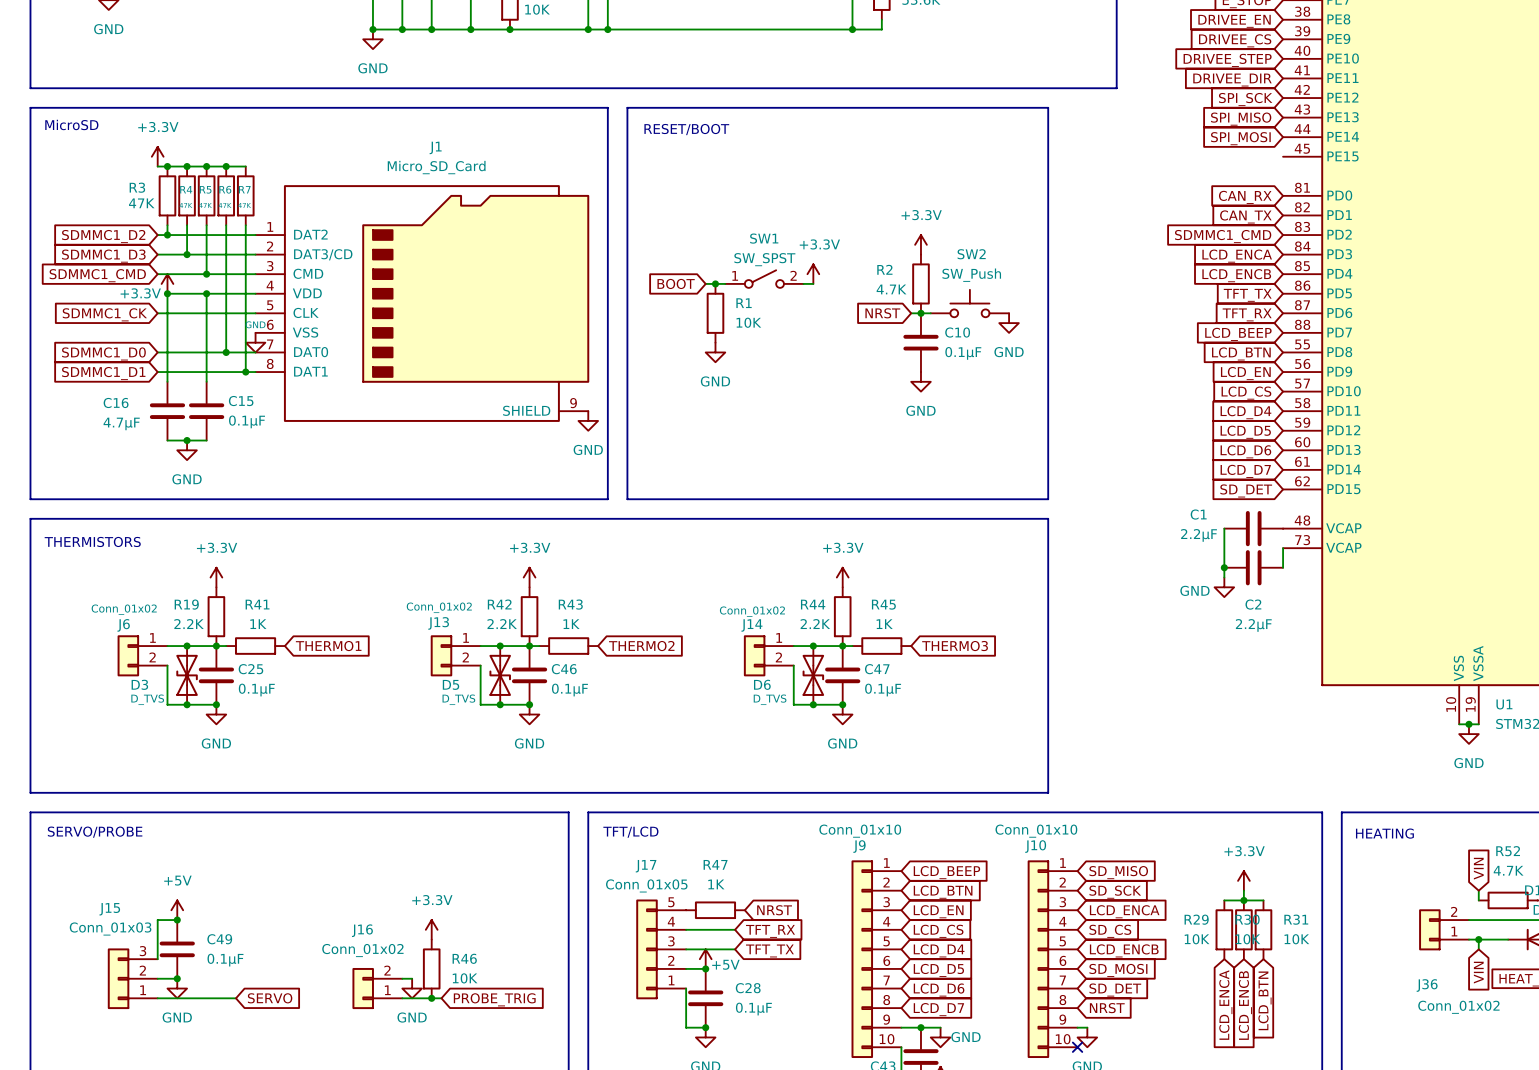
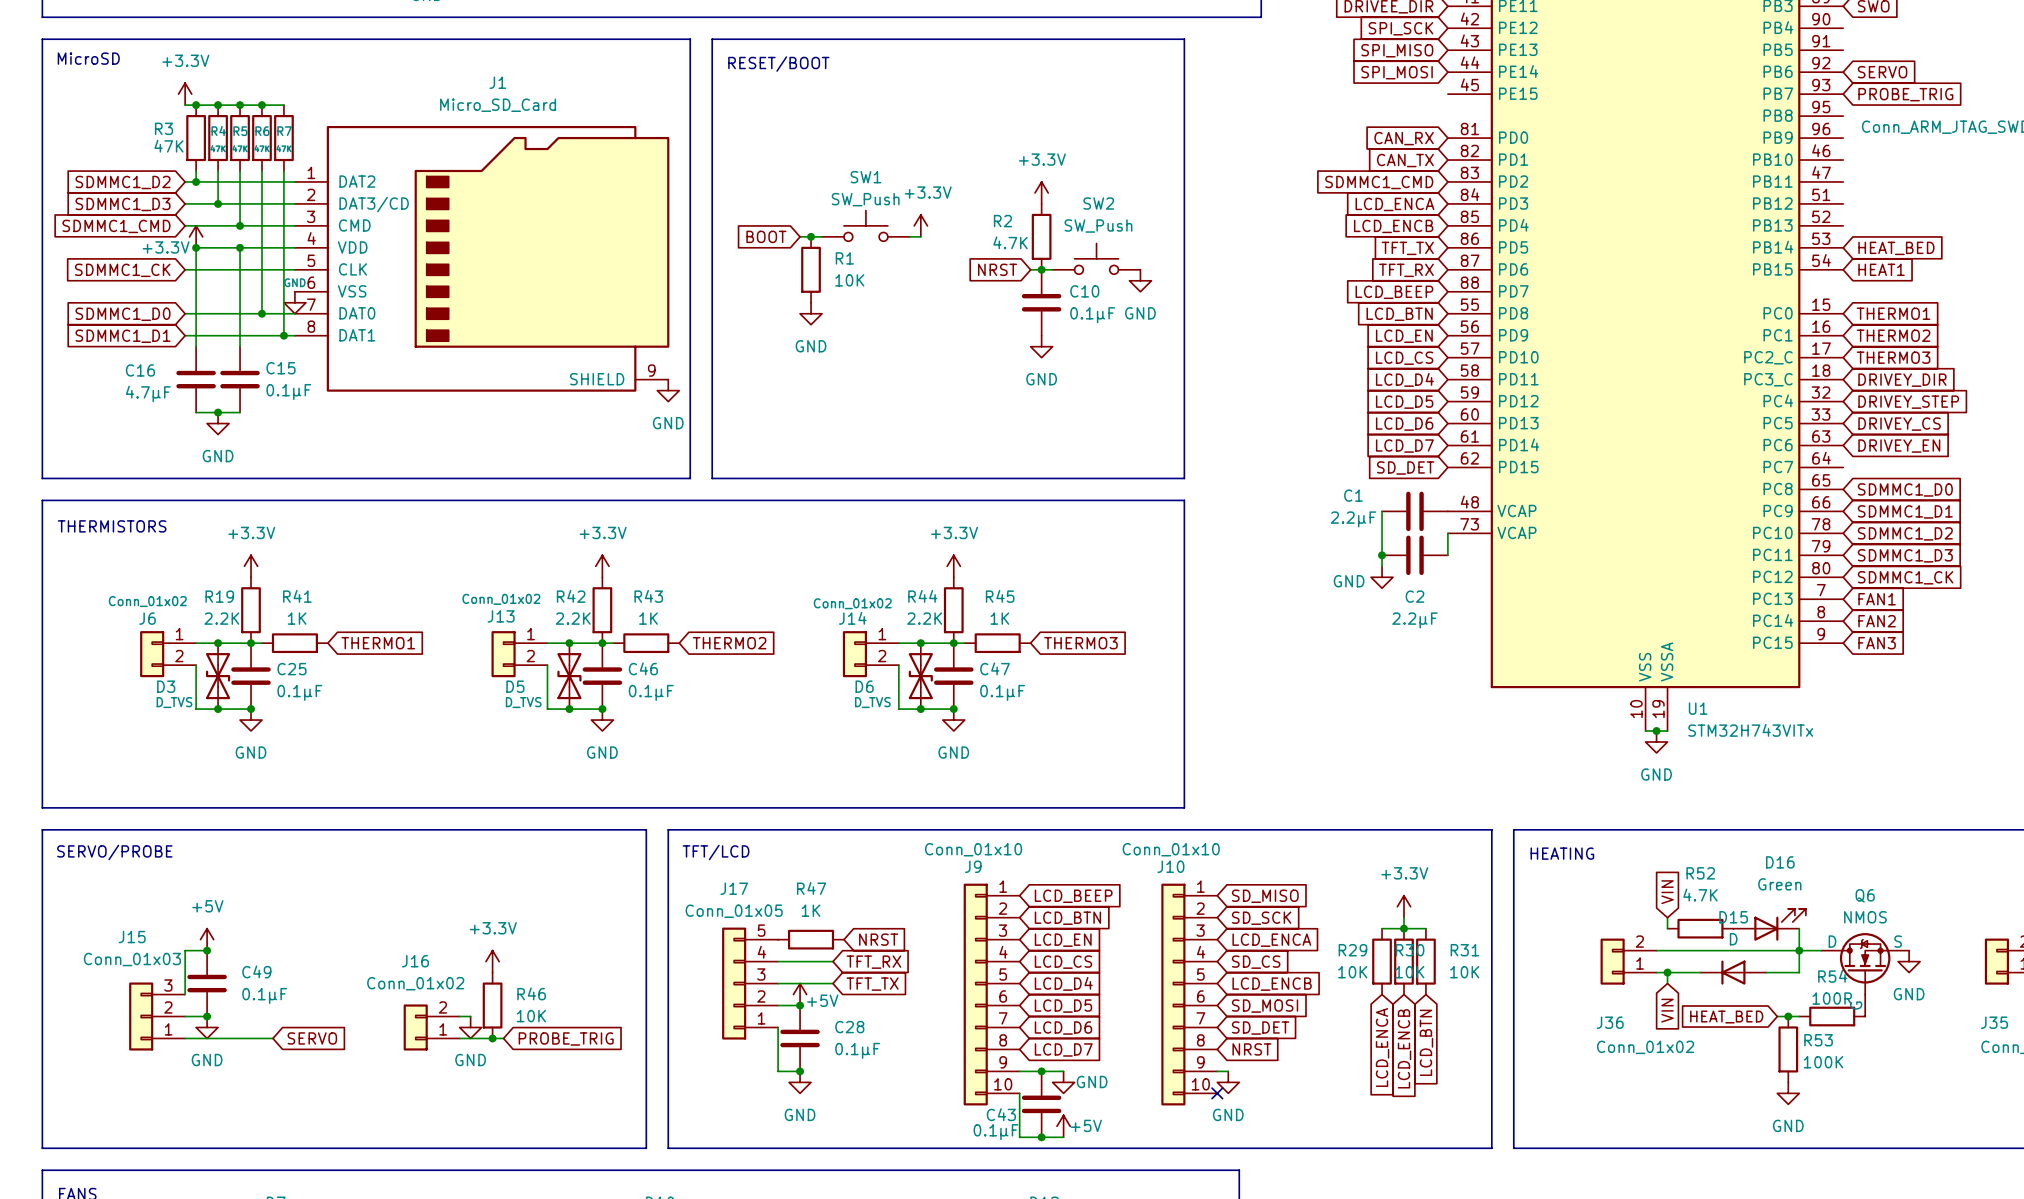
SW1 value: SW_SPST (764, 259) -> SW_Push (865, 199)
SW1 symbol: [725, 270, 804, 288] -> [822, 210, 910, 242]

